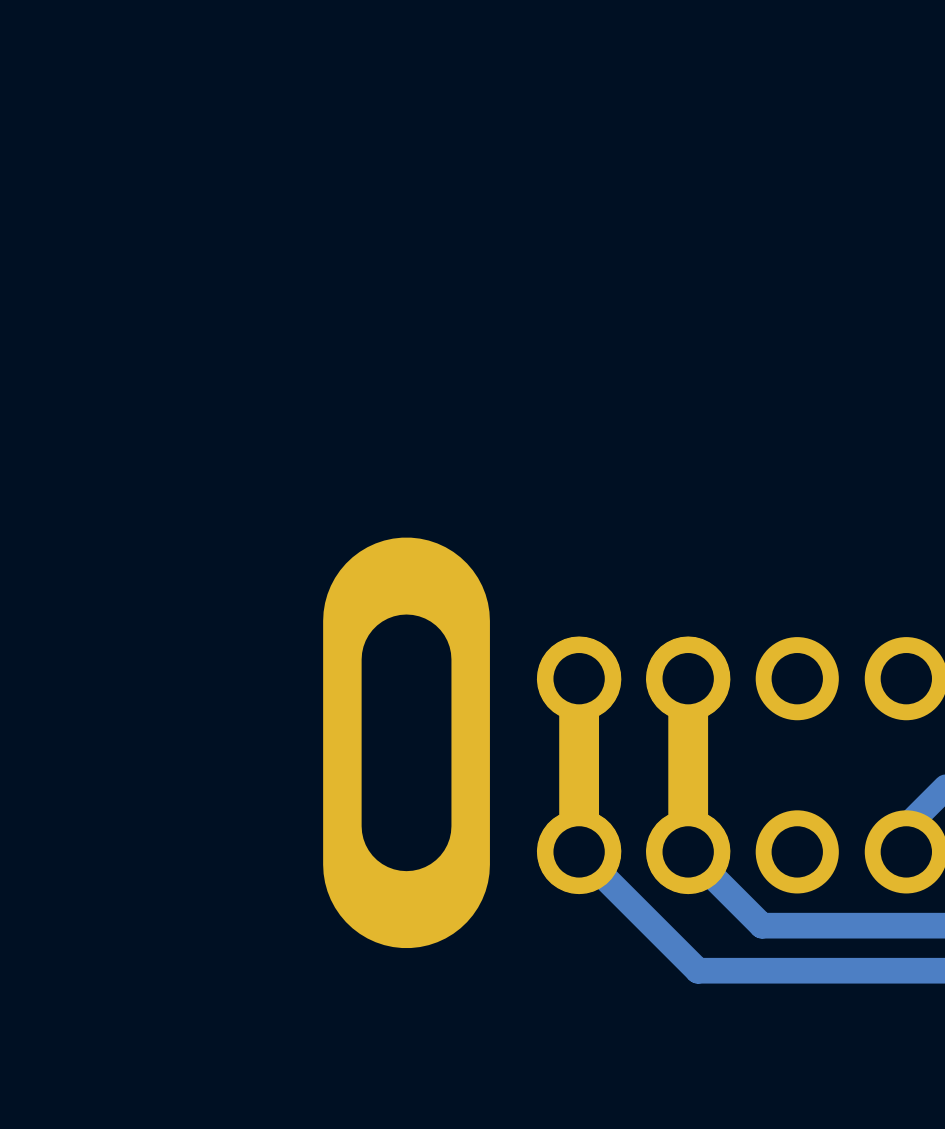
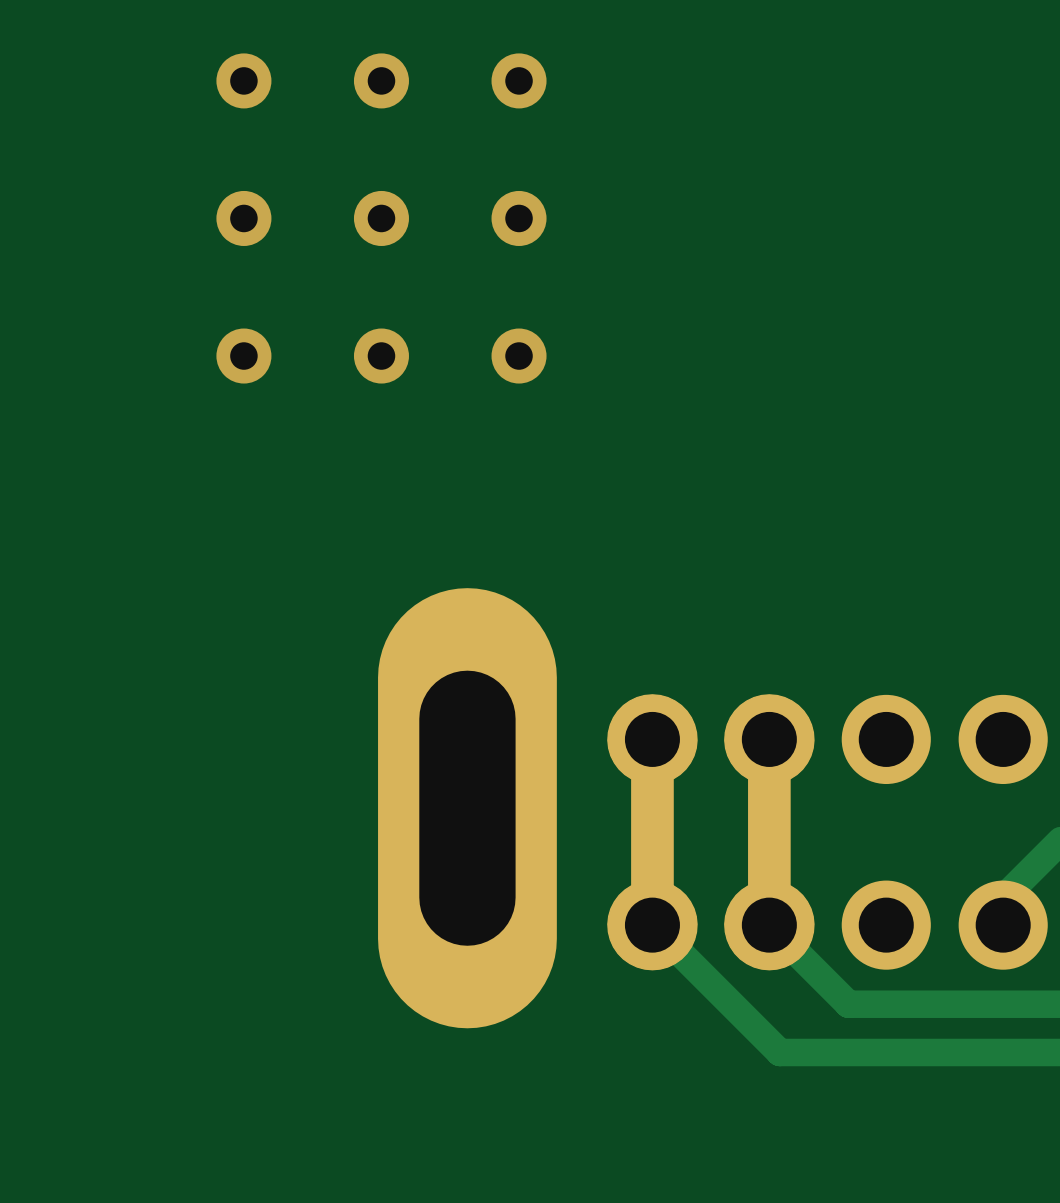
via: none -> (243, 80)
via: none -> (381, 80)
via: none -> (519, 80)
via: none -> (243, 218)
via: none -> (381, 218)
via: none -> (519, 218)
via: none -> (243, 356)
via: none -> (381, 356)
via: none -> (519, 356)

